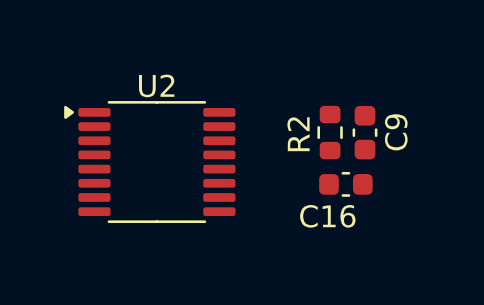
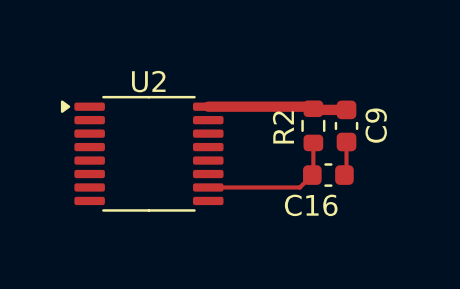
track: none -> (208, 106) (311, 106) (314, 109) (346, 109)
track: none -> (346, 142) (346, 172) (344, 175)
track: none -> (313, 142) (313, 174) (299, 187) (208, 187)

